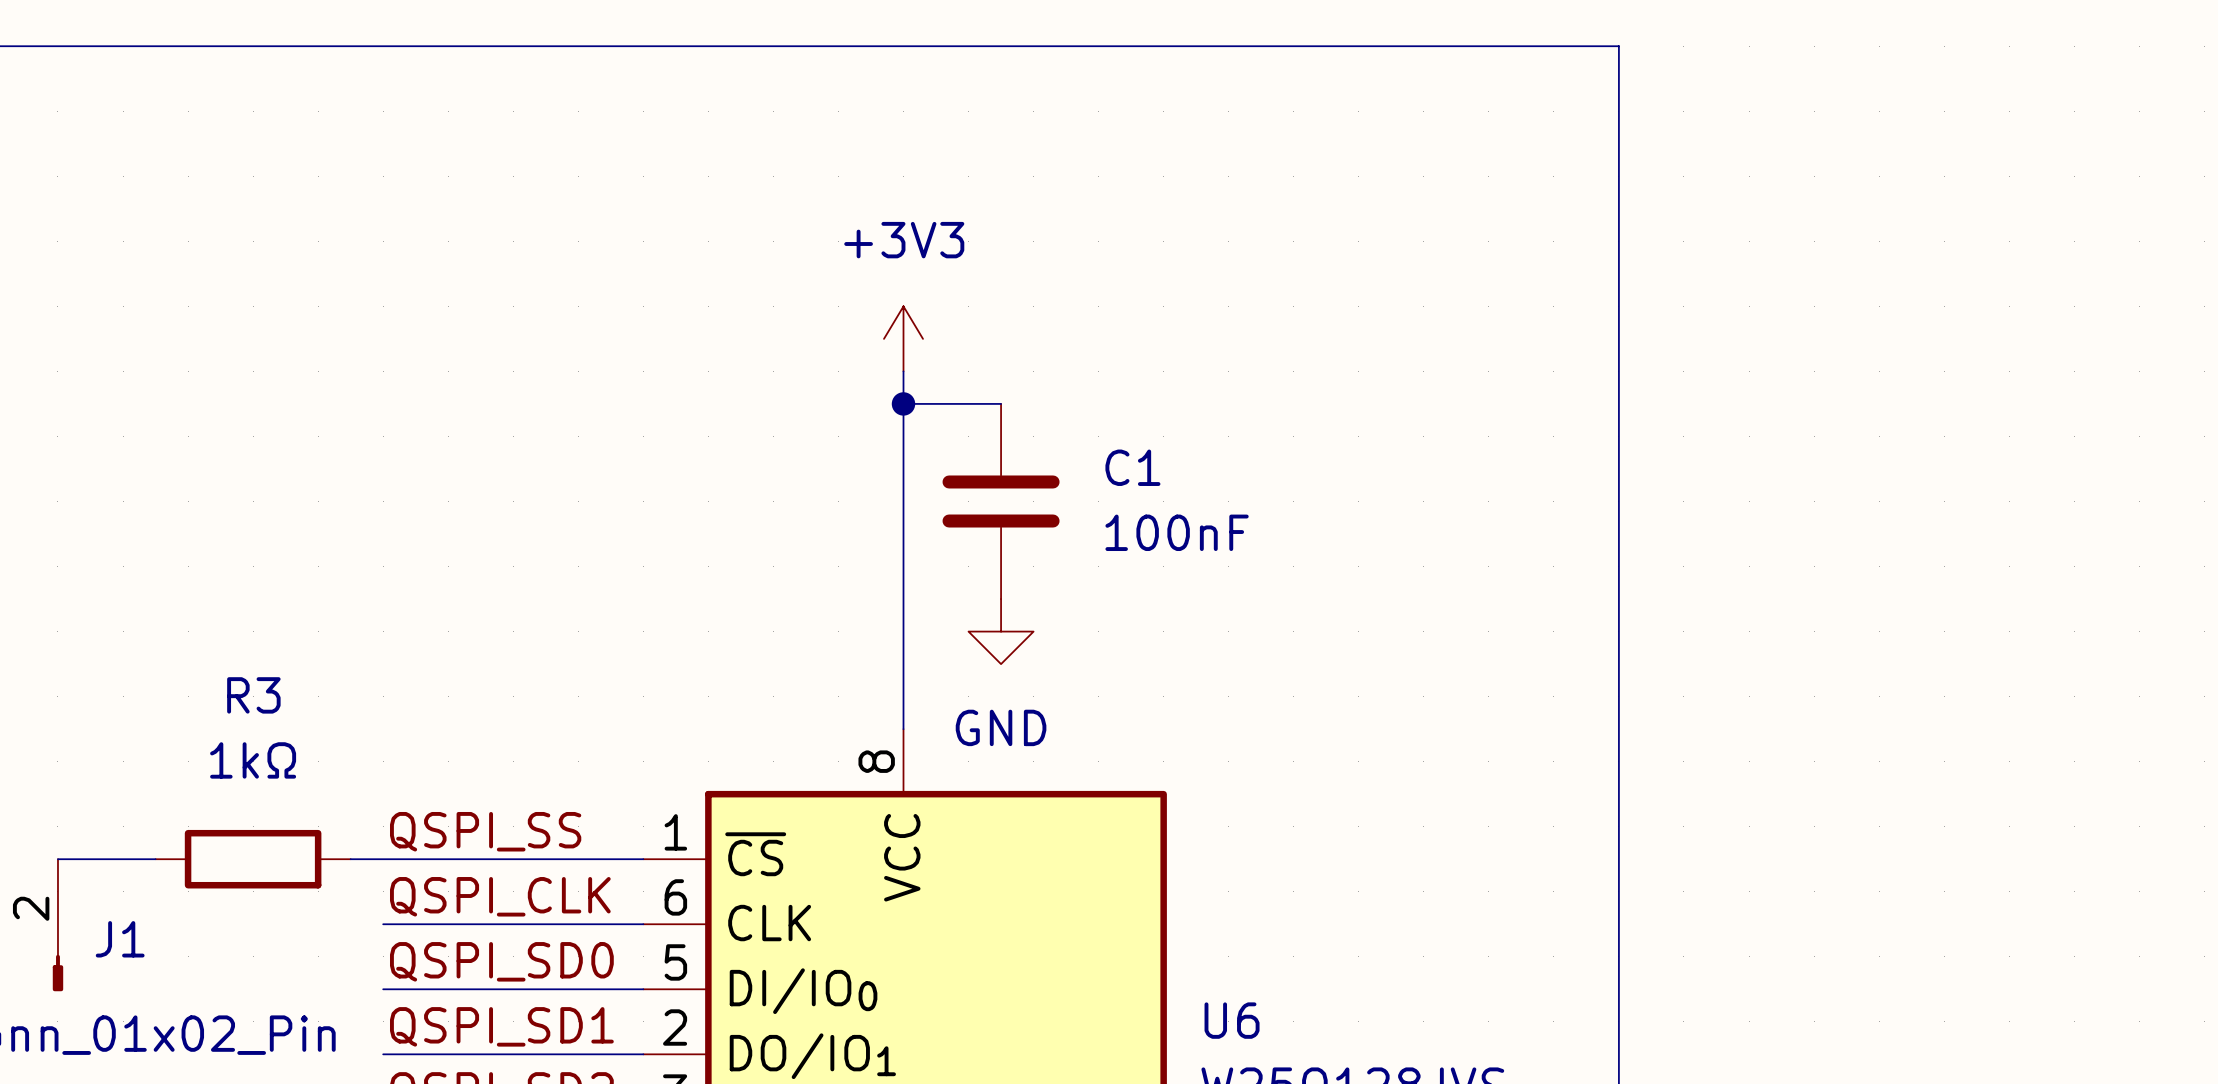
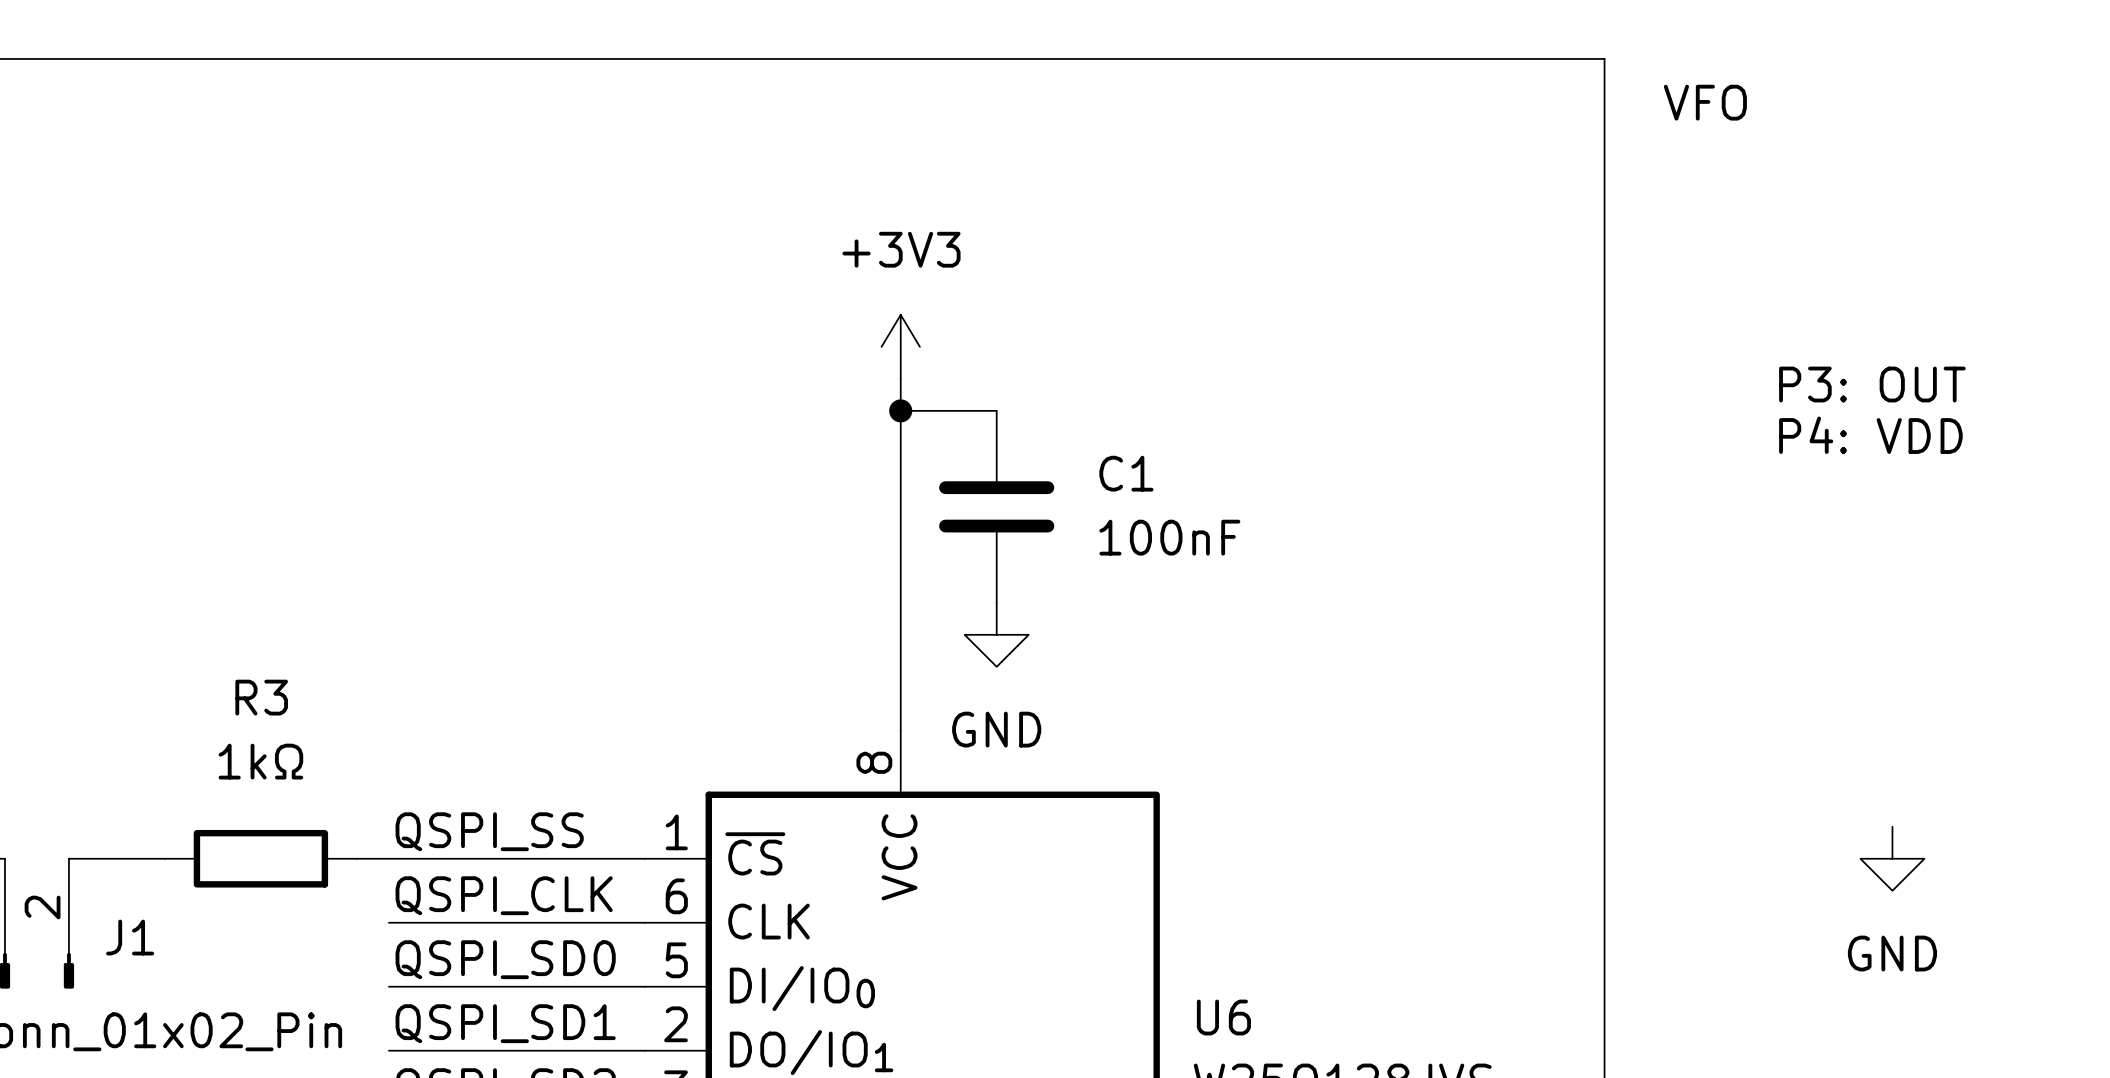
text: none -> VFO (1705, 102)
text: none -> P3: OUT (1872, 384)
text: none -> P4: VDD (1870, 435)
power symbol: none -> GND (1892, 858)

